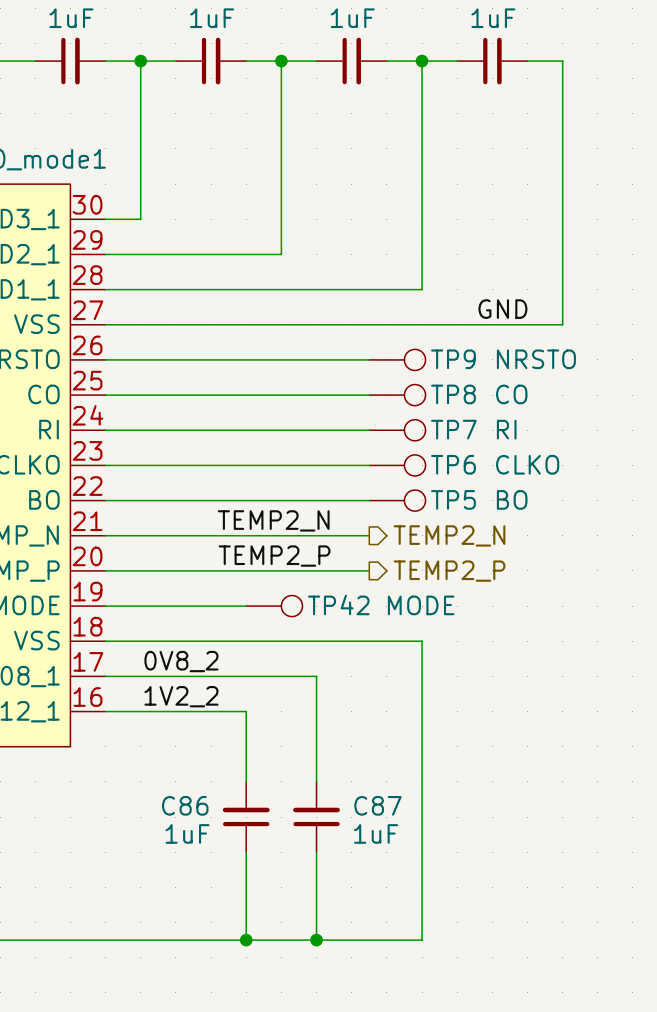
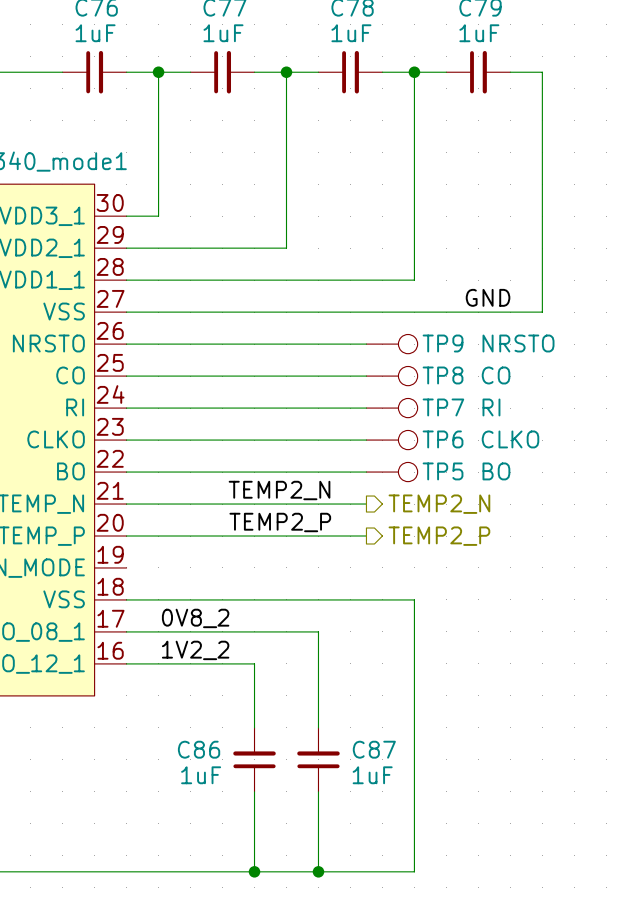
wire: (105, 606) (246, 606) -> none
TP42: MODE (274, 606) -> none

